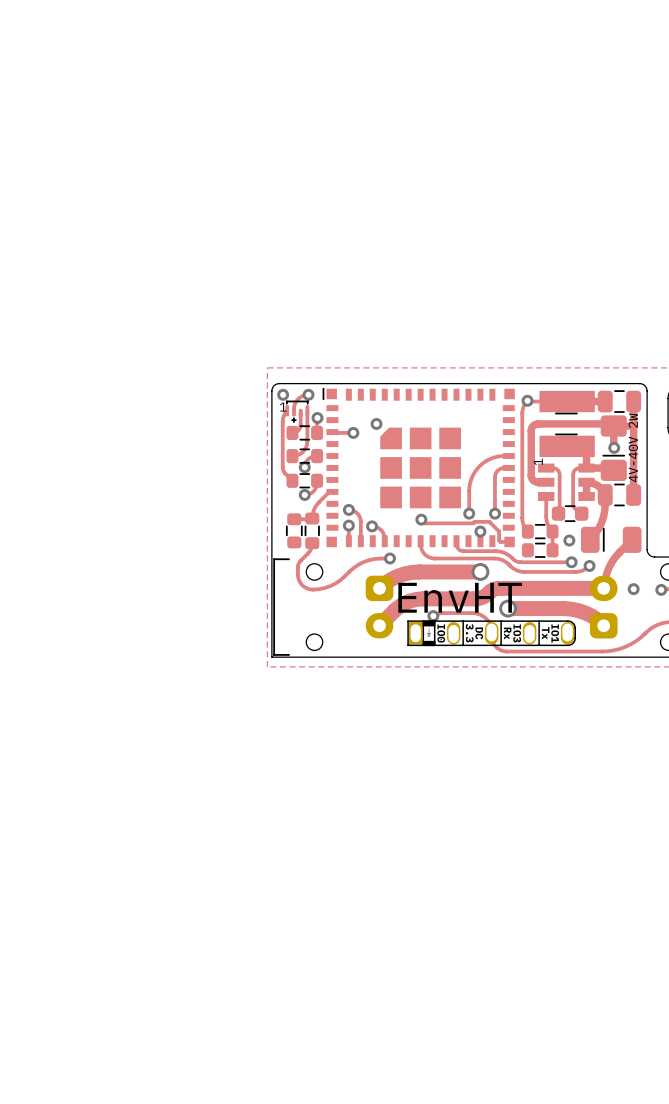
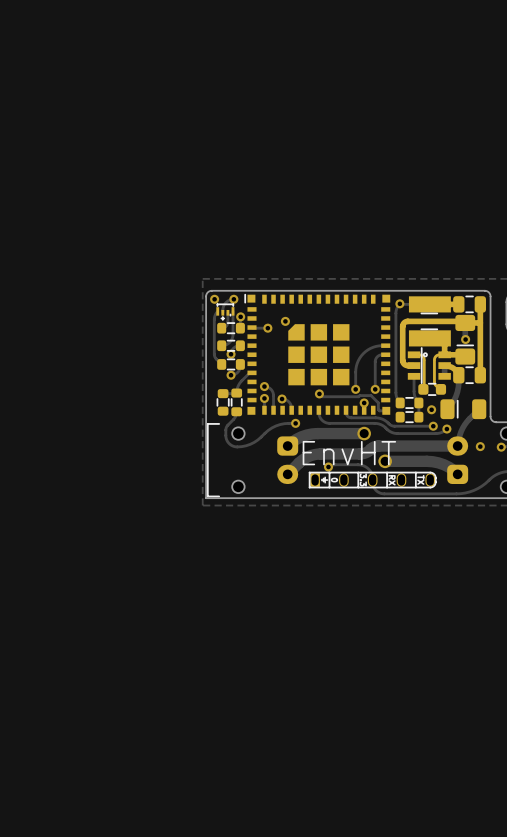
part footprint: [527, 390, 642, 521] -> [399, 296, 487, 395]
part footprint: [285, 400, 310, 423] -> [216, 303, 235, 321]
part footprint: [407, 620, 576, 647] -> [309, 471, 437, 489]

